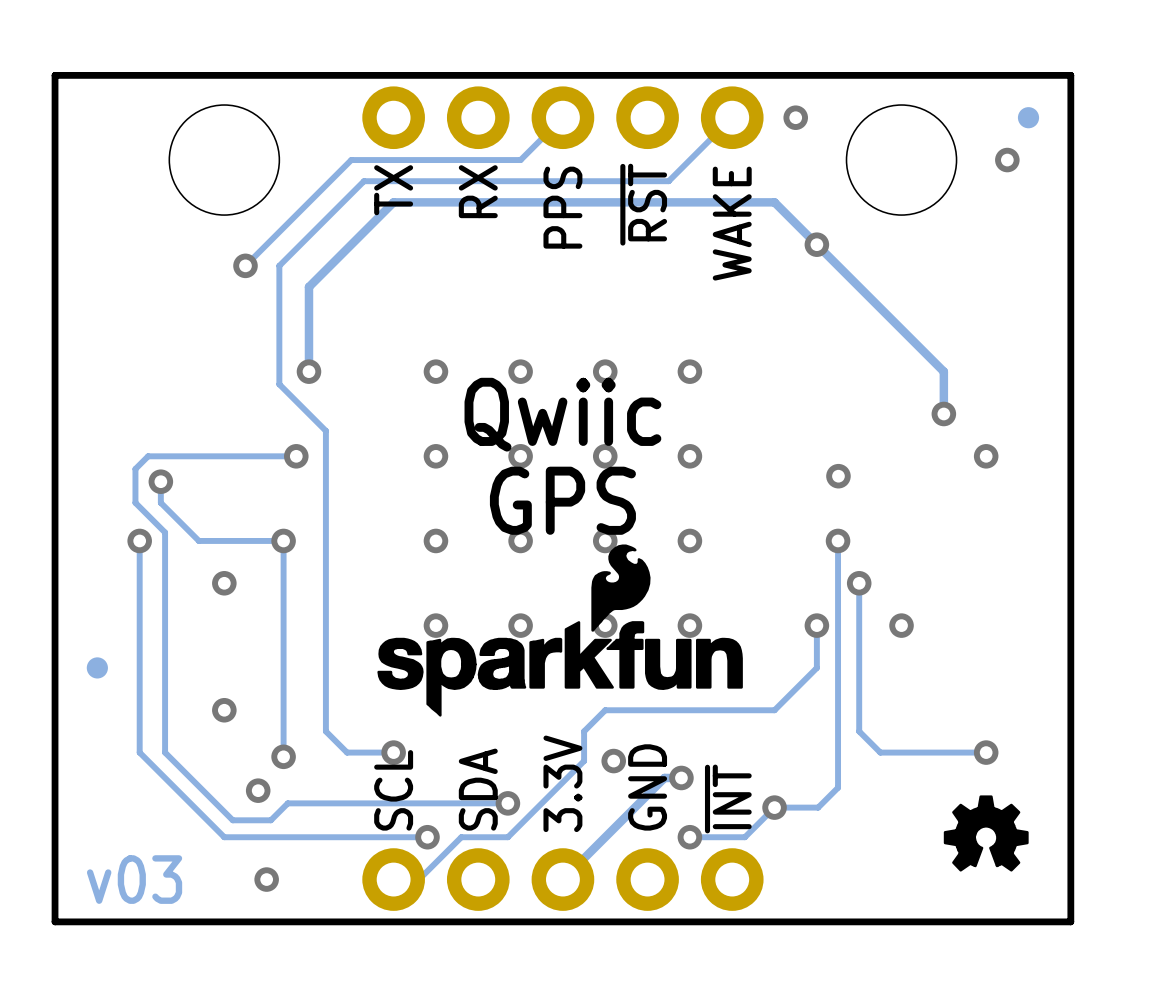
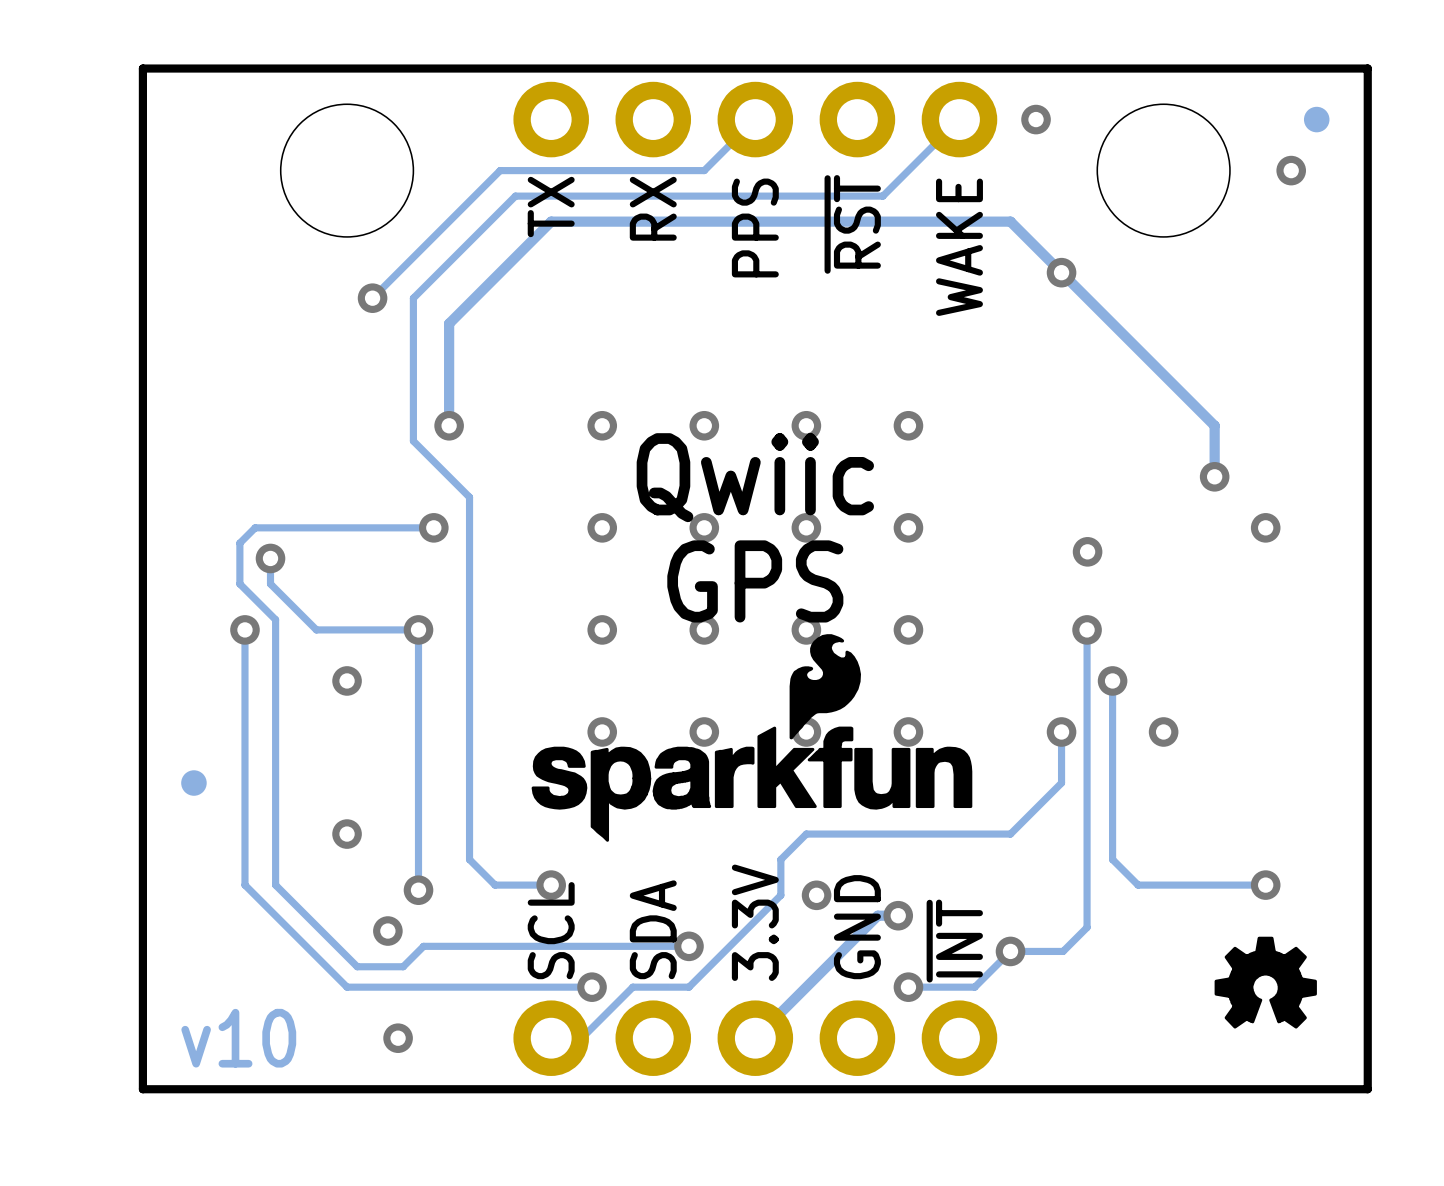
text: v03 (134, 879) -> v10 (238, 1038)

